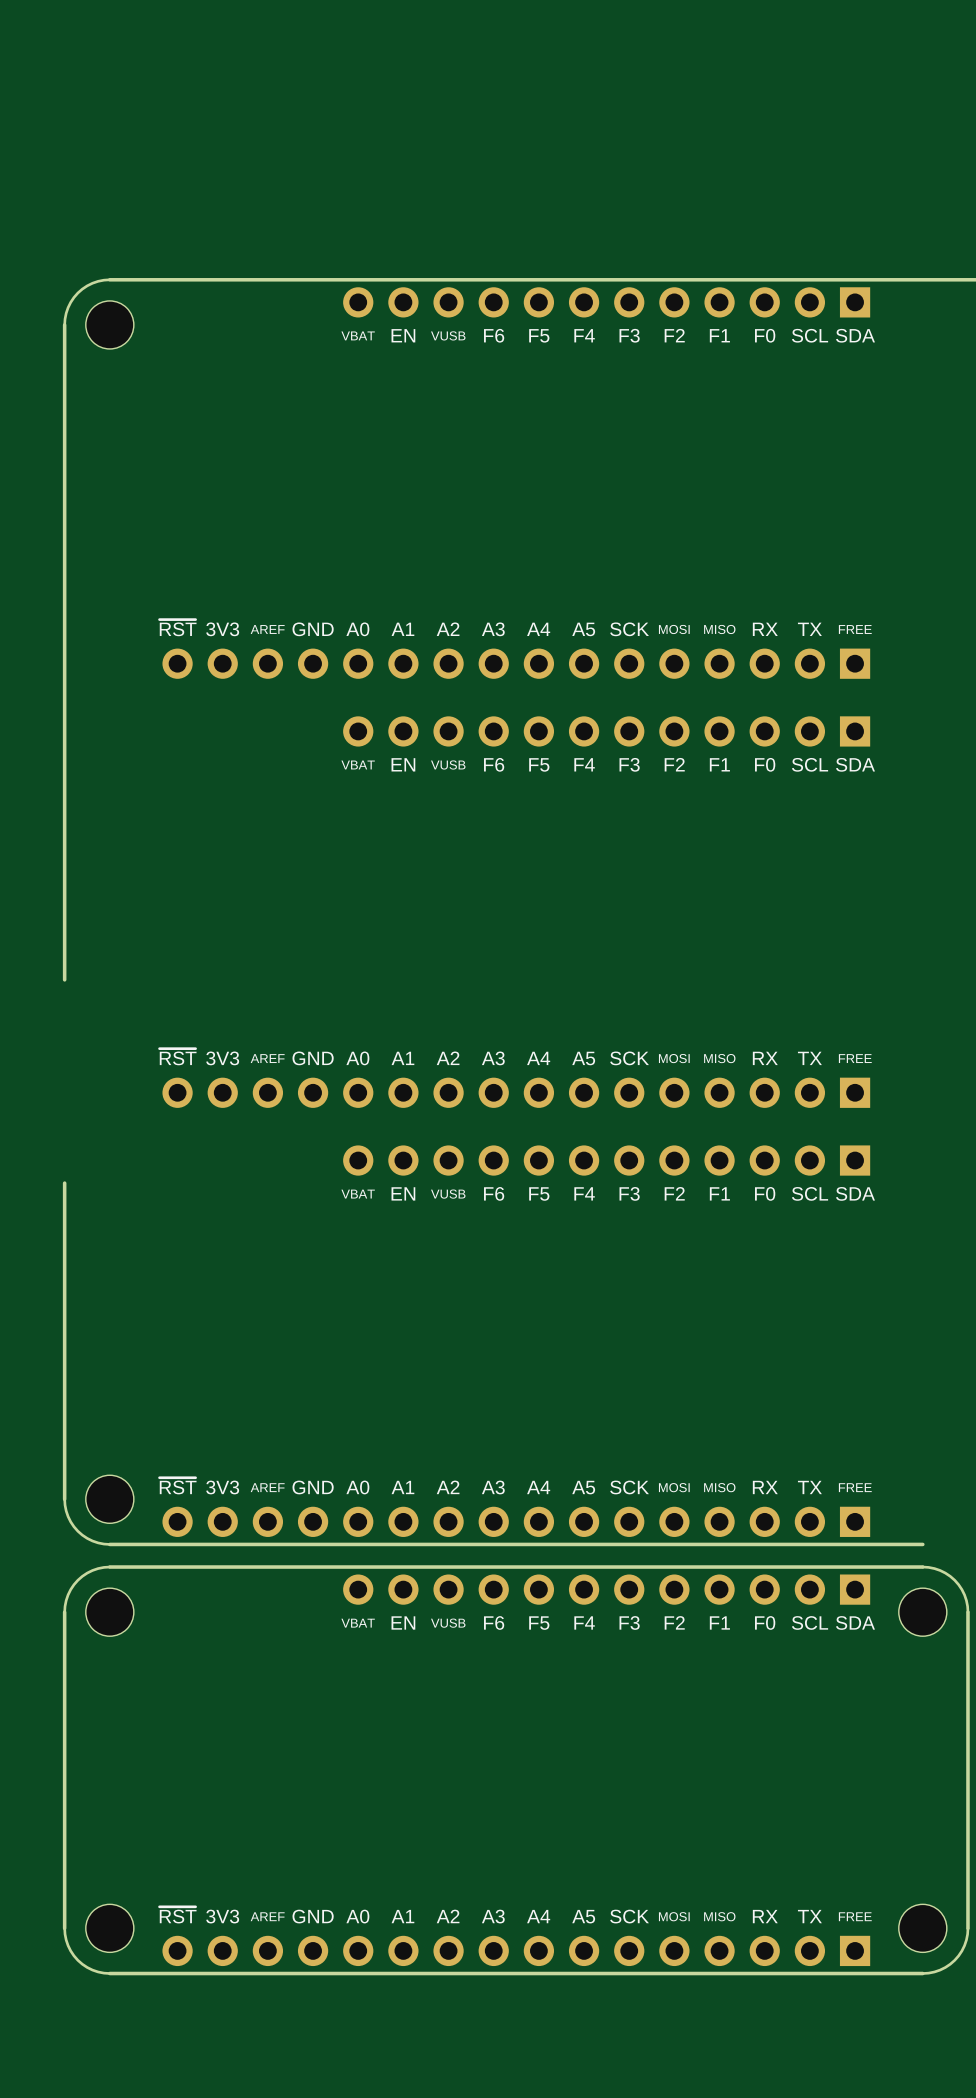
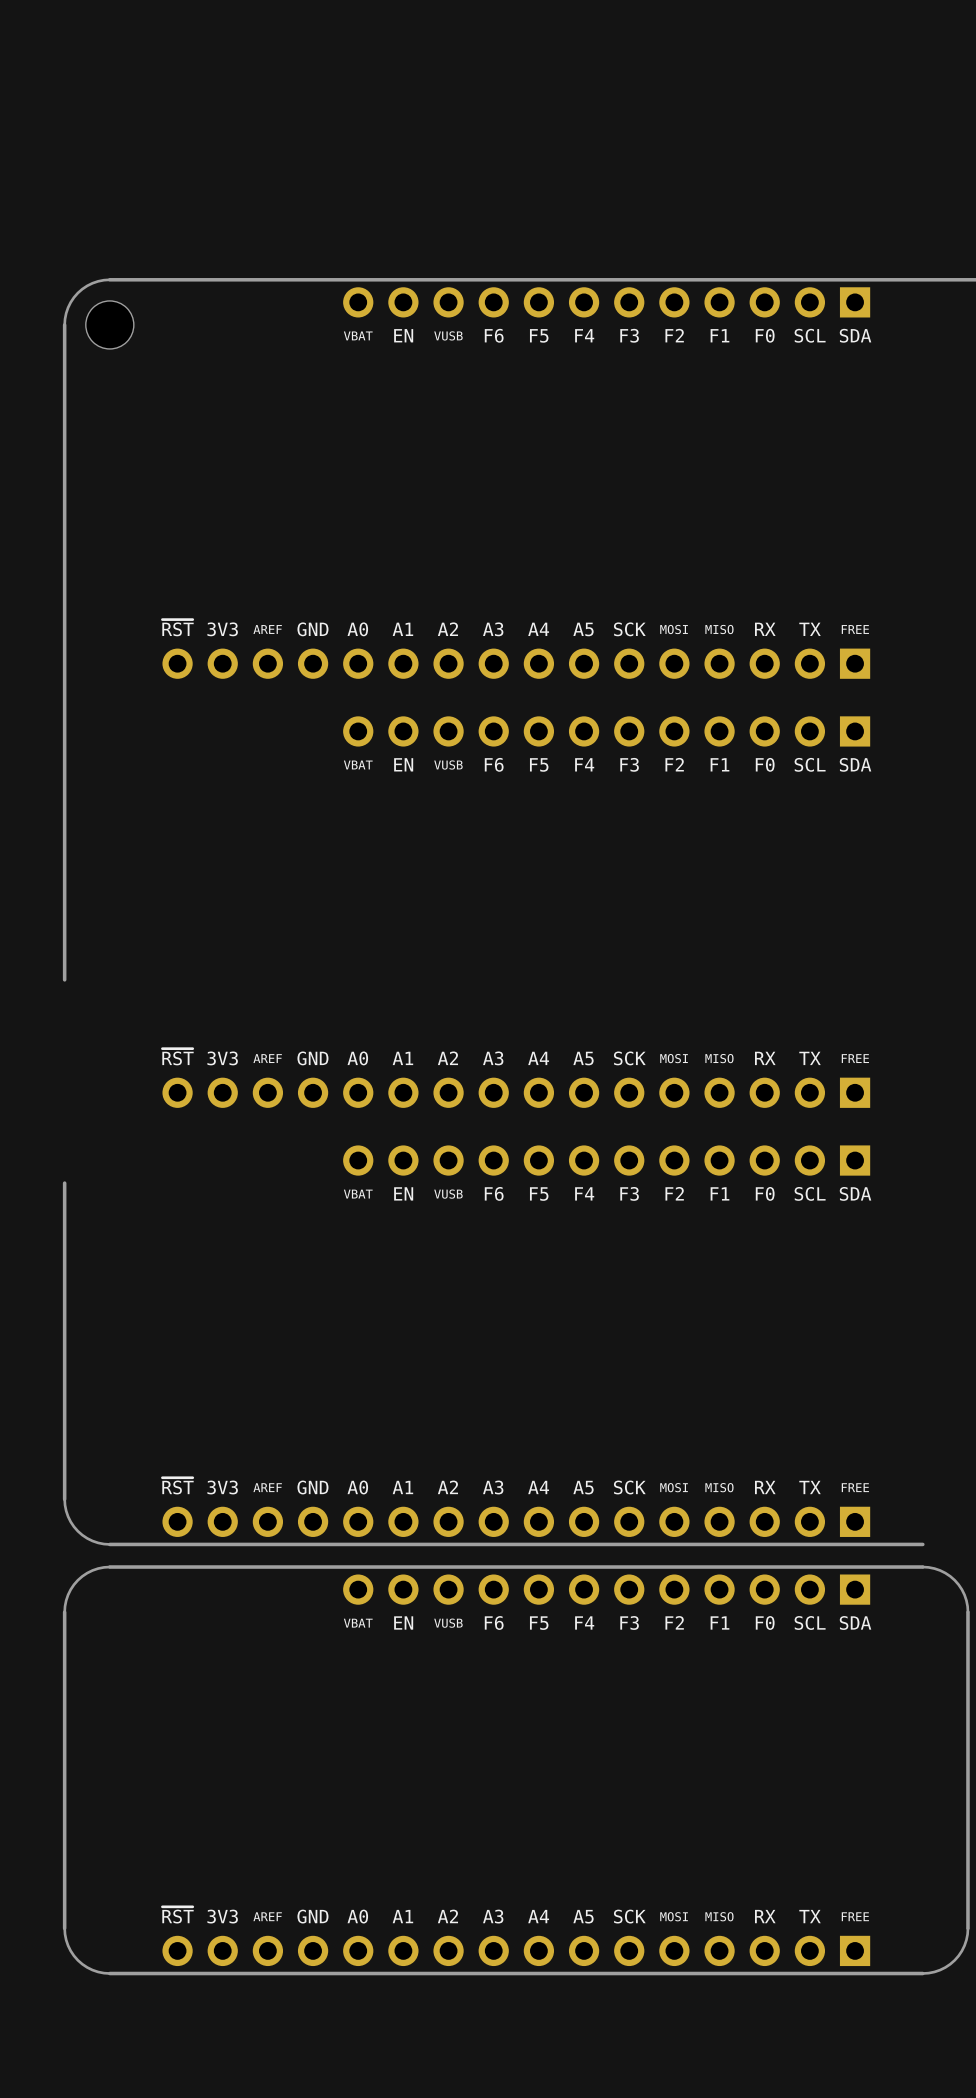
part: (109, 1499) -> none
part: (109, 1612) -> none
part: (922, 1612) -> none
part: (109, 1928) -> none
part: (922, 1928) -> none

